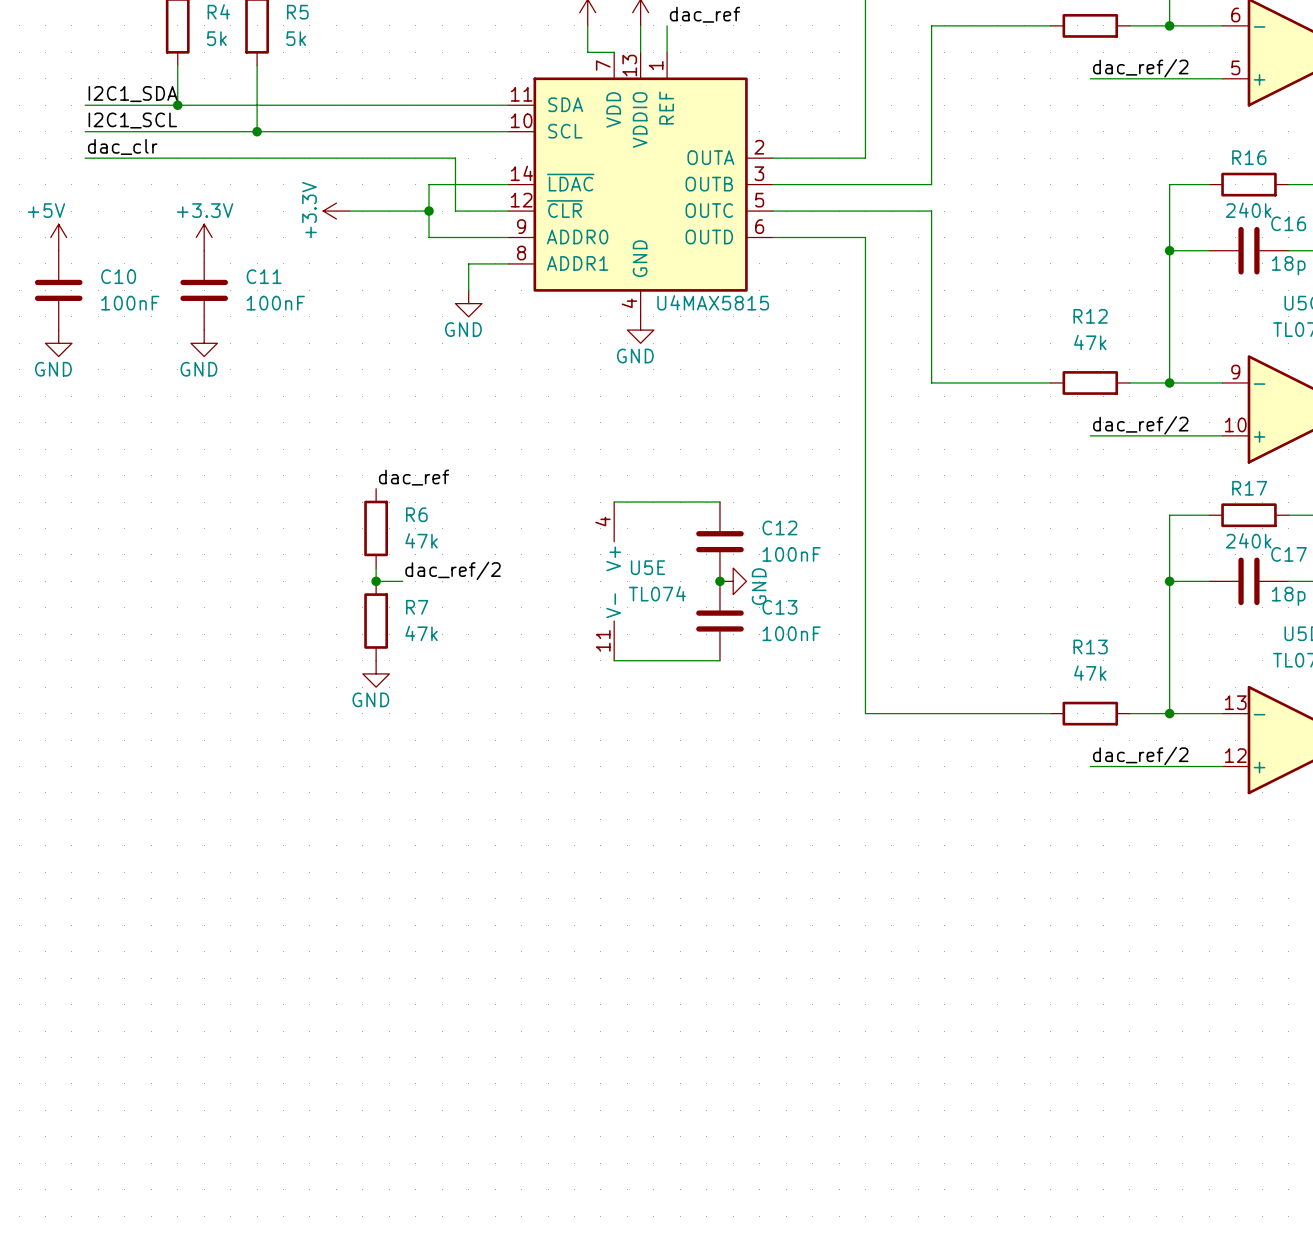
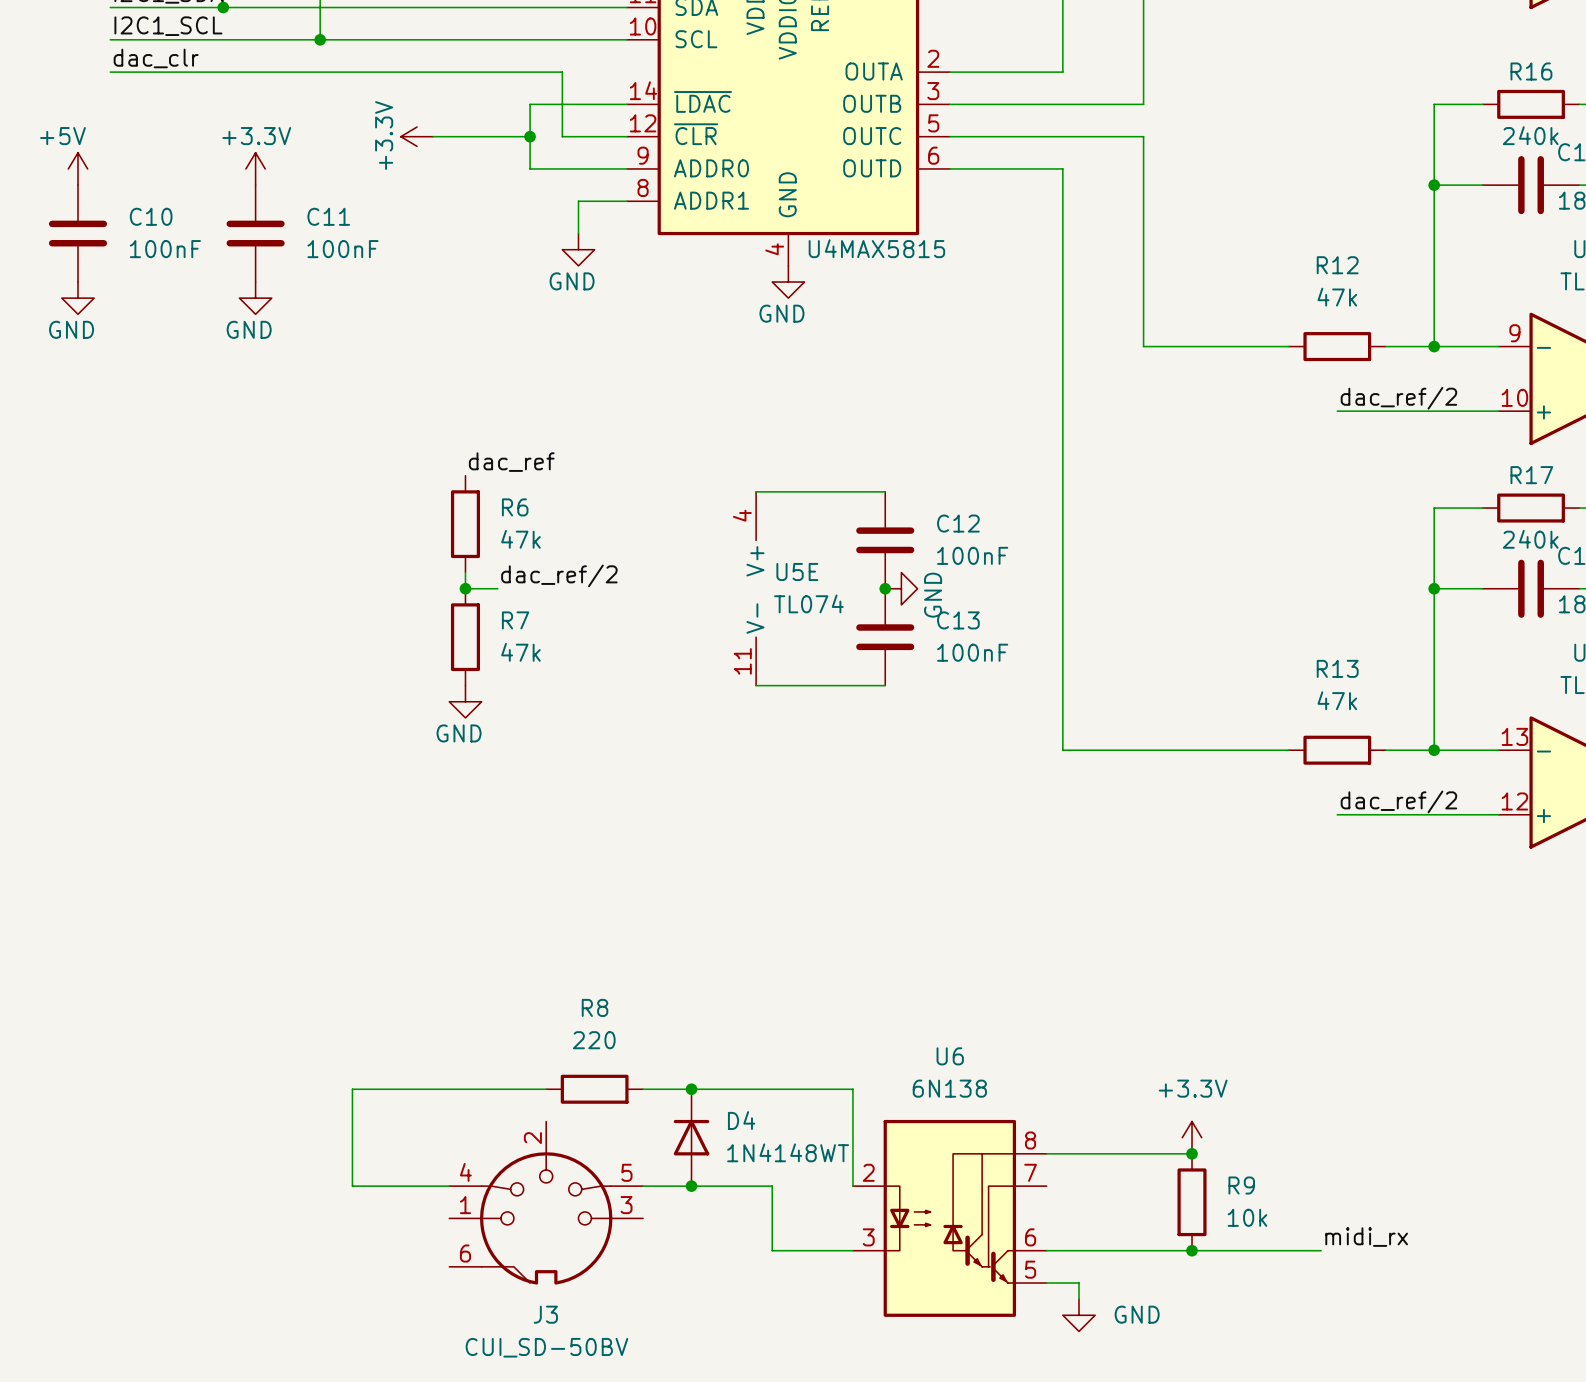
wire: none -> (546, 1089) (352, 1089) (352, 1186) (449, 1186)
R8: none -> 220 (594, 1089)
wire: none -> (643, 1089) (852, 1089) (852, 1186)
junction: none -> (691, 1089)
D4: none -> 1N4148WT (691, 1137)
power symbol: none -> +3.3V (1192, 1137)
wire: none -> (1046, 1153) (1192, 1153)
junction: none -> (1192, 1153)
wire: none -> (643, 1186) (772, 1186) (772, 1250) (852, 1250)
junction: none -> (691, 1186)
R9: none -> 10k (1192, 1202)
J3: none -> CUI_SD-50BV (546, 1203)
U6: none -> 6N138 (949, 1218)
label: none -> midi_rx (1366, 1237)
wire: none -> (1046, 1250) (1321, 1250)
junction: none -> (1192, 1250)
wire: none -> (1046, 1282) (1078, 1282) (1078, 1299)
power symbol: none -> GND (1078, 1315)

